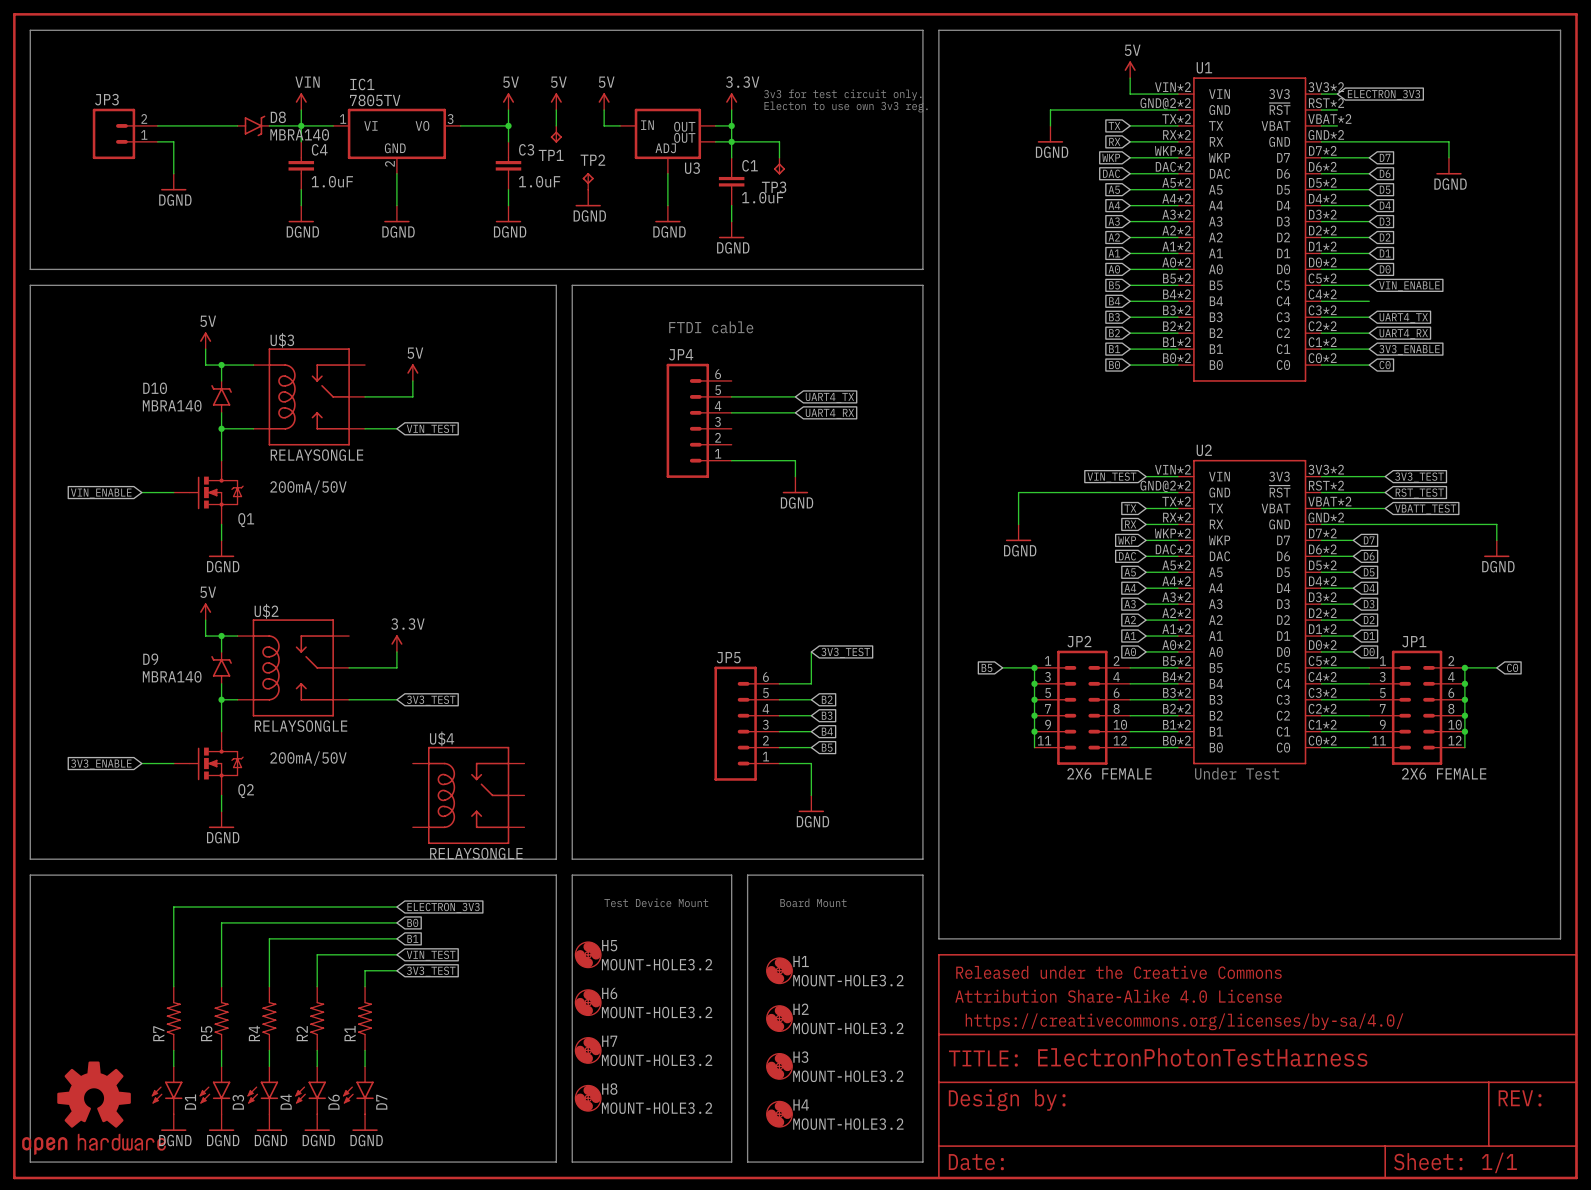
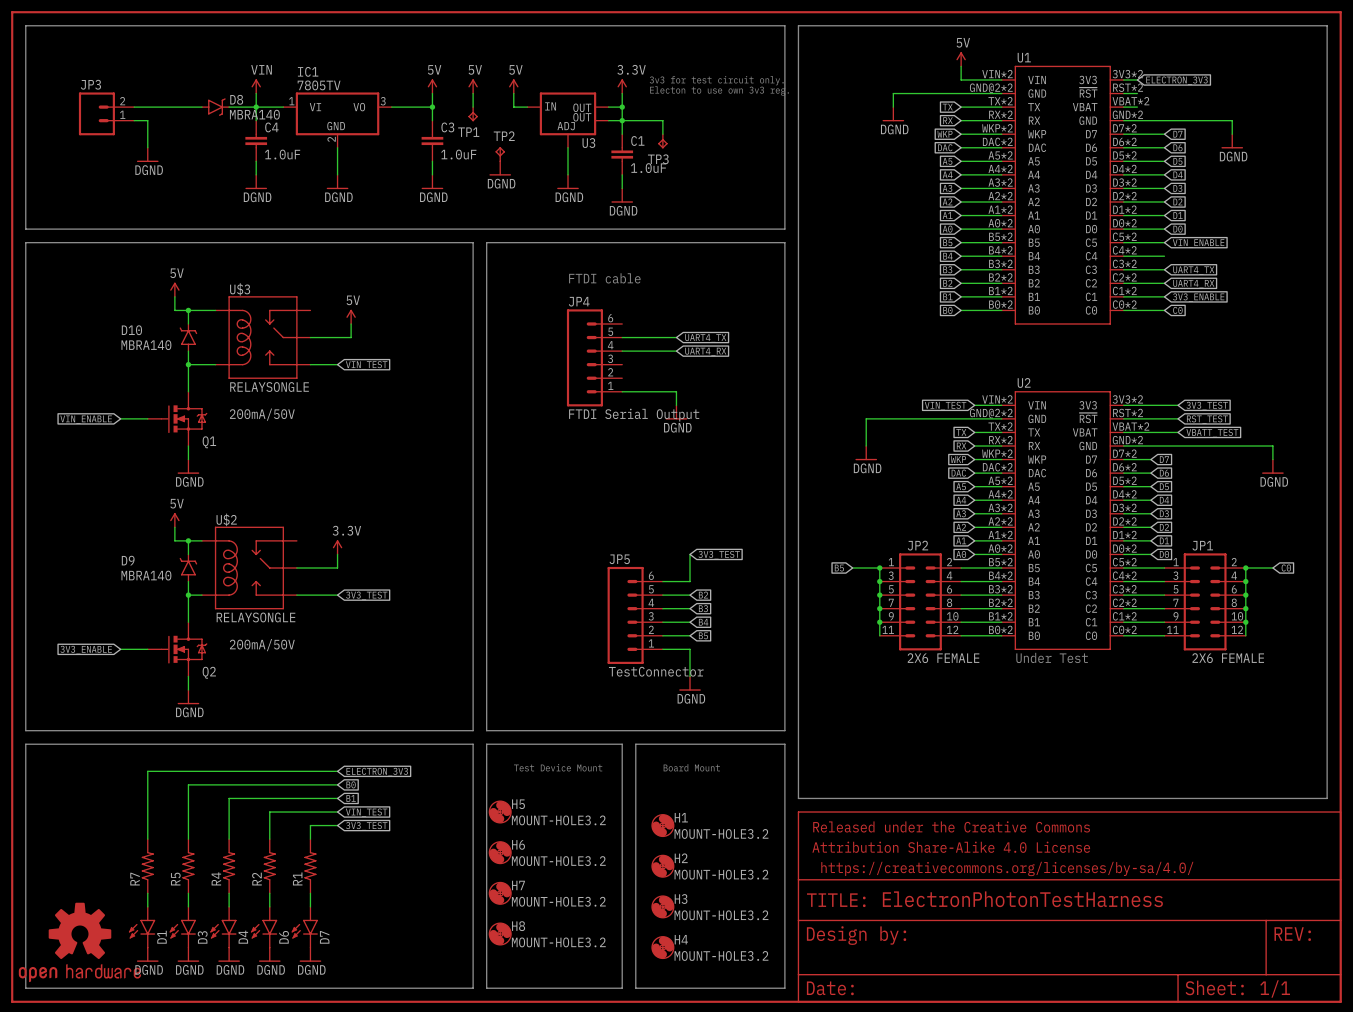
JP4 value: none -> FTDI Serial Output (634, 415)
JP5 value: none -> TestConnector (656, 671)
U$4: RELAYSONGLE (468, 795) -> none

